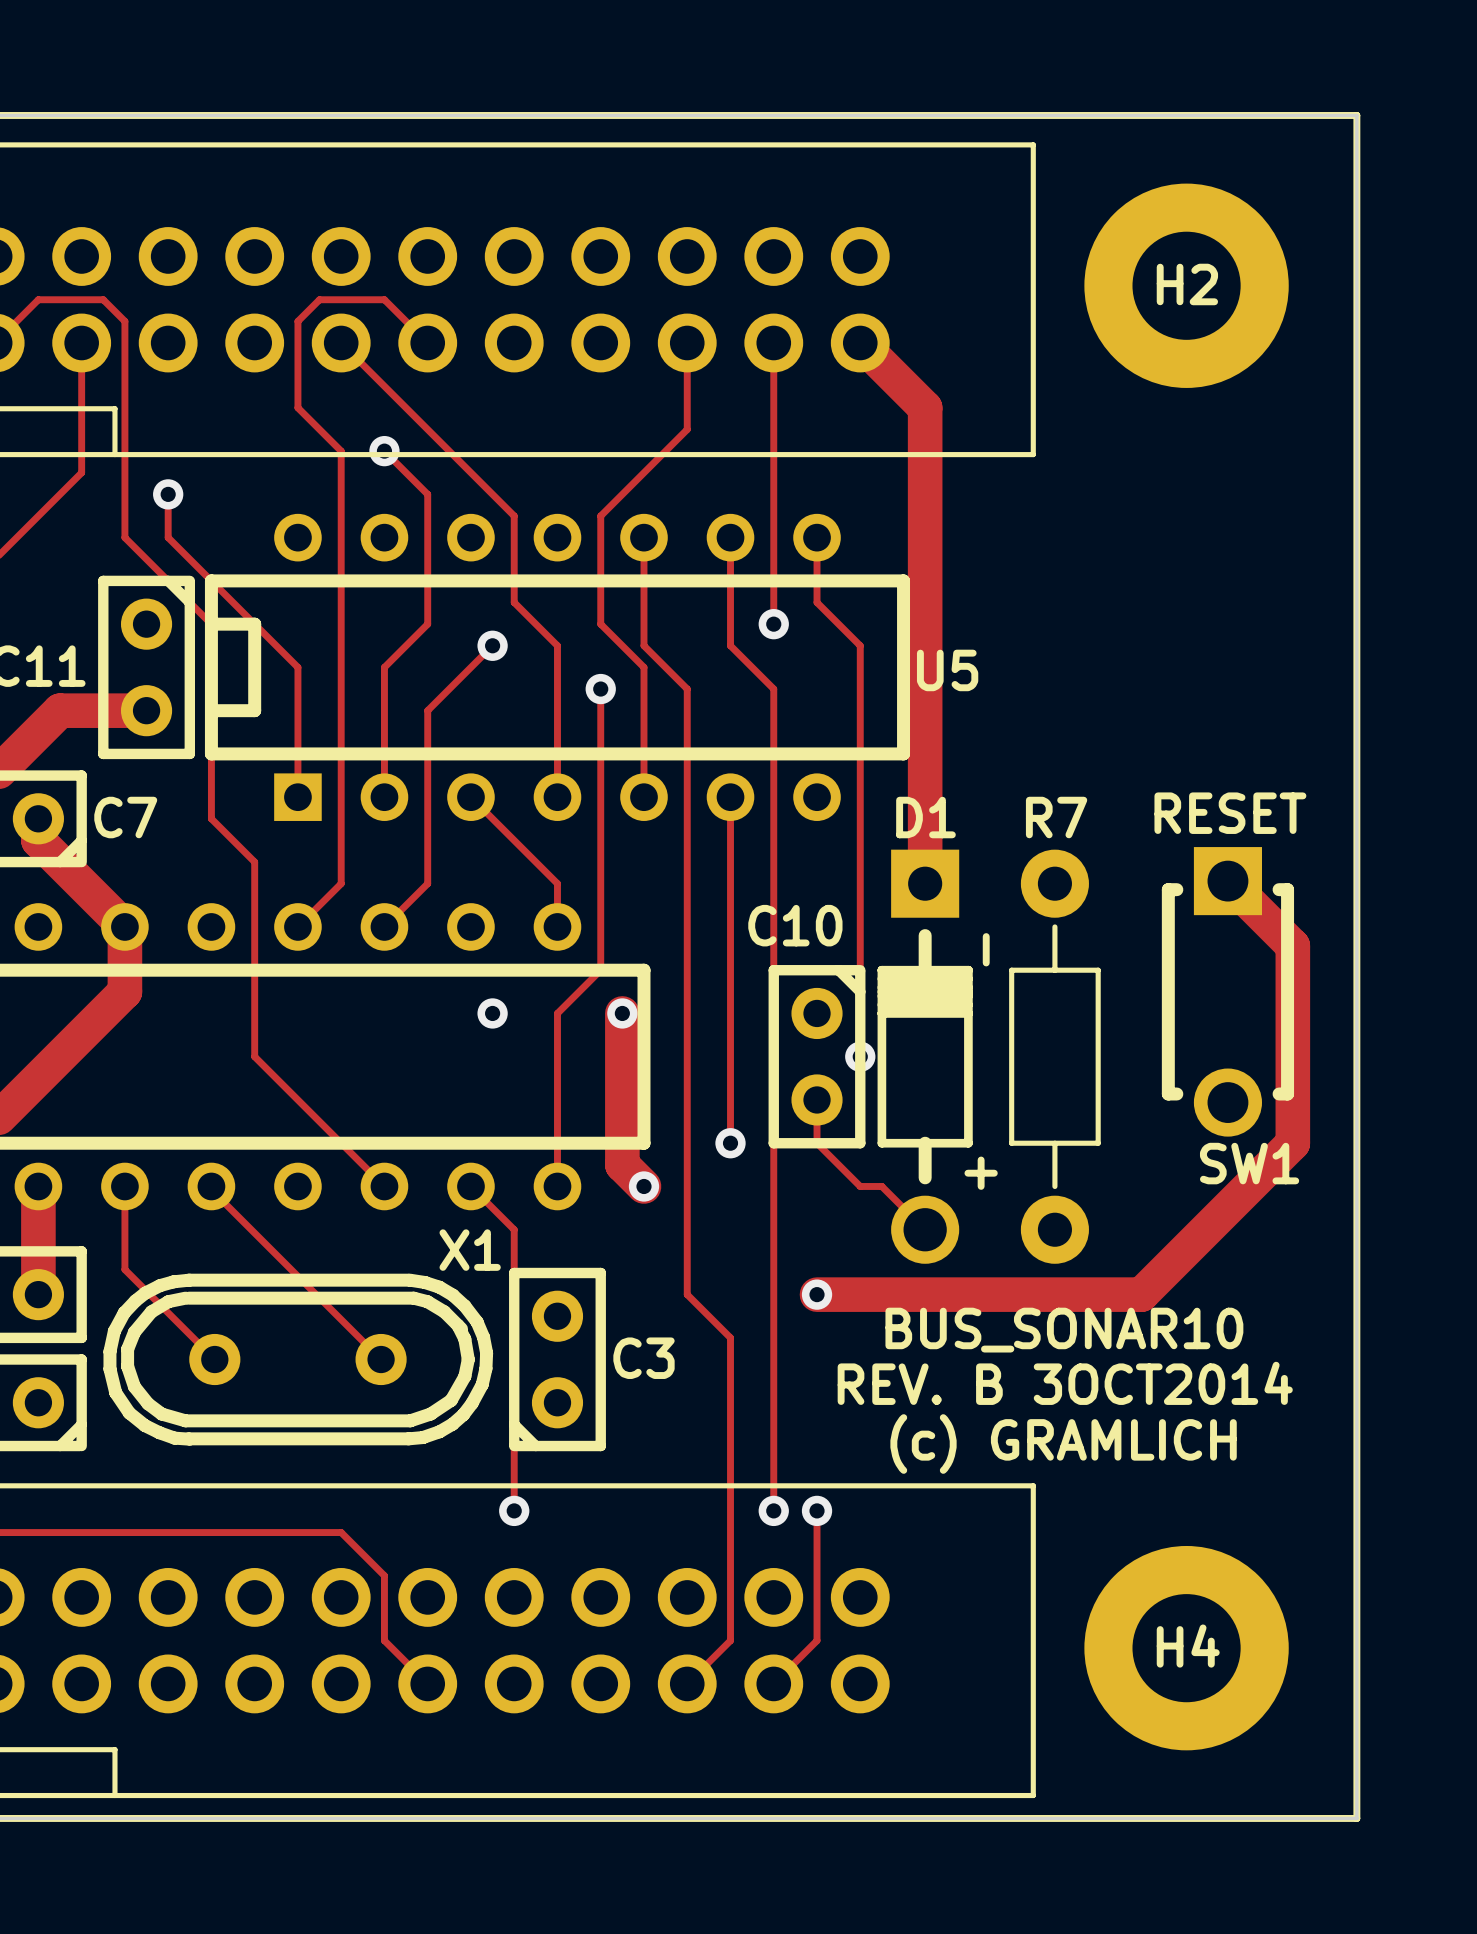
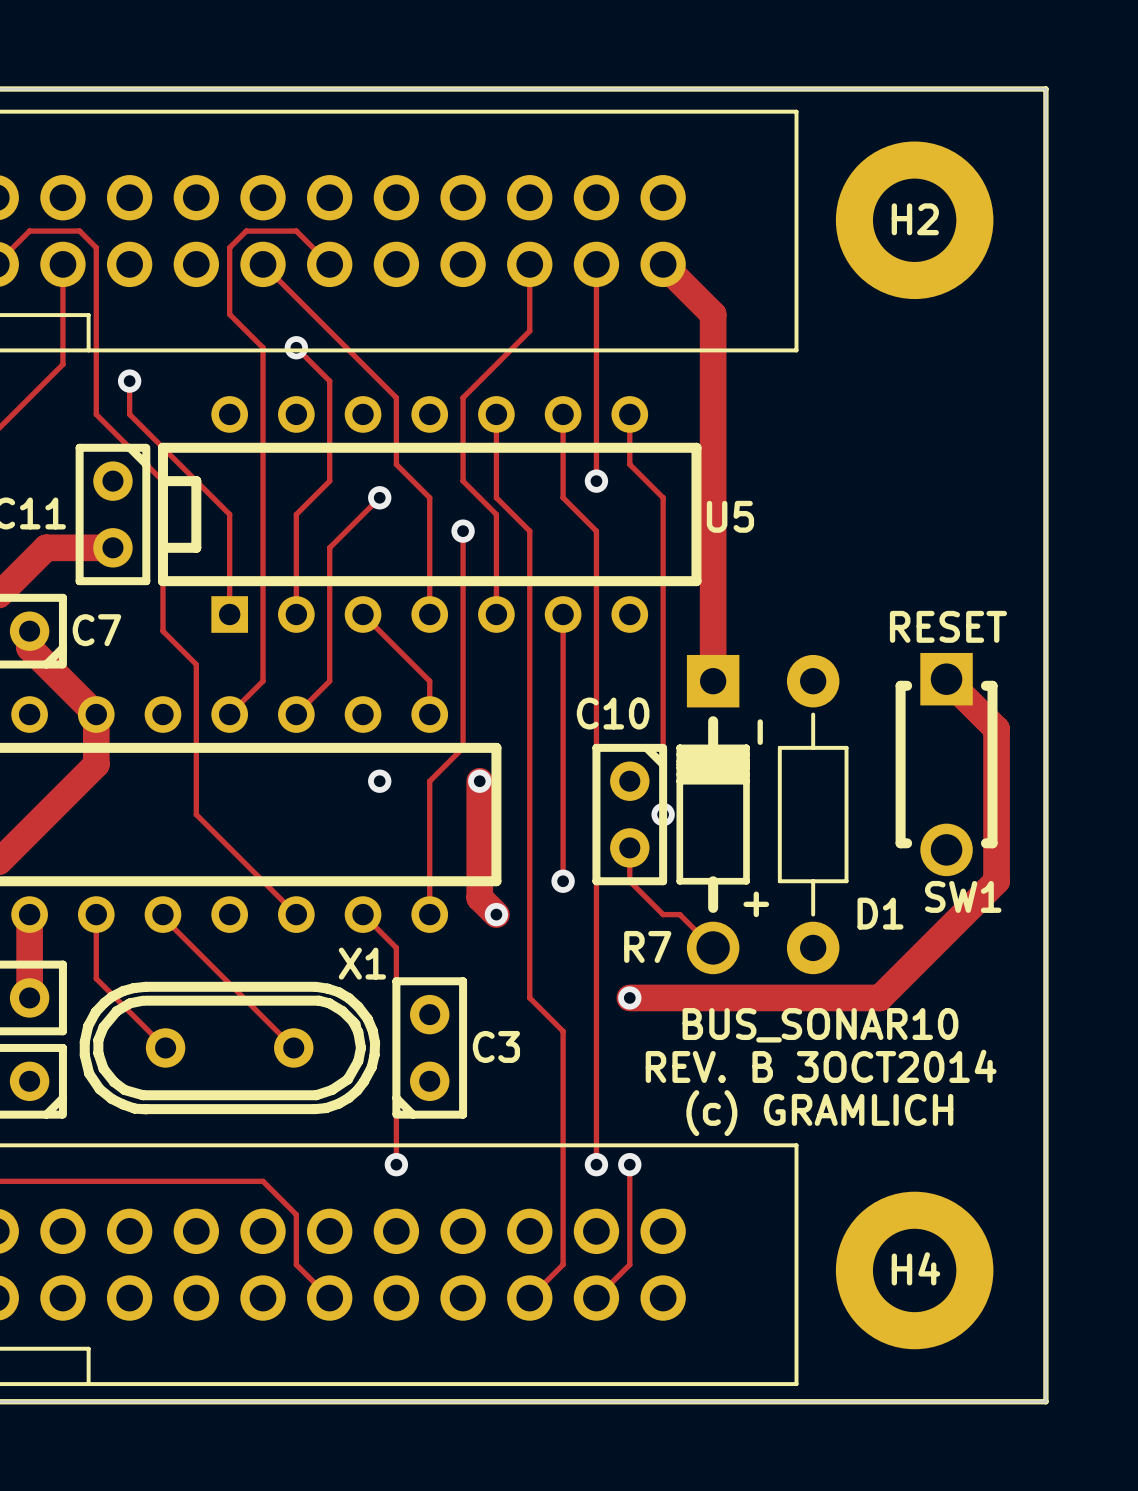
D1 name position: D1 (925, 817) -> D1 (880, 913)
R7 name position: R7 (1056, 817) -> R7 (647, 946)

